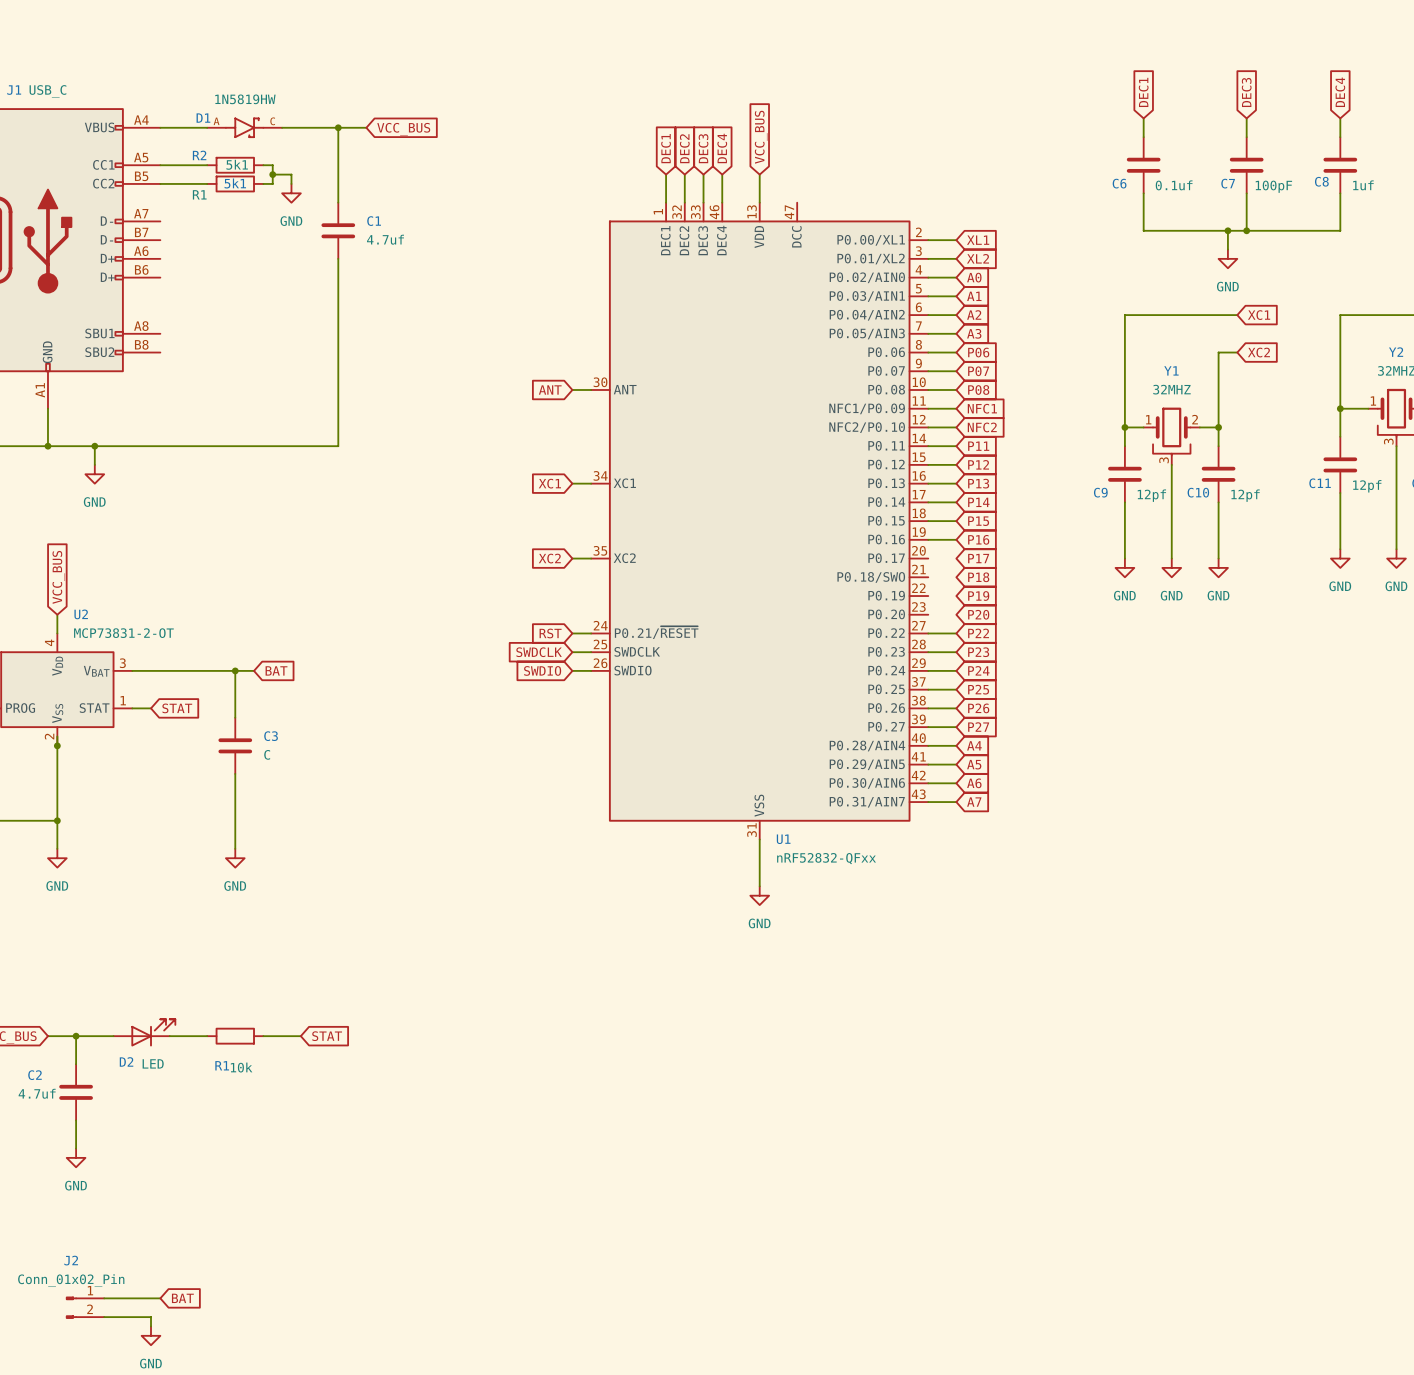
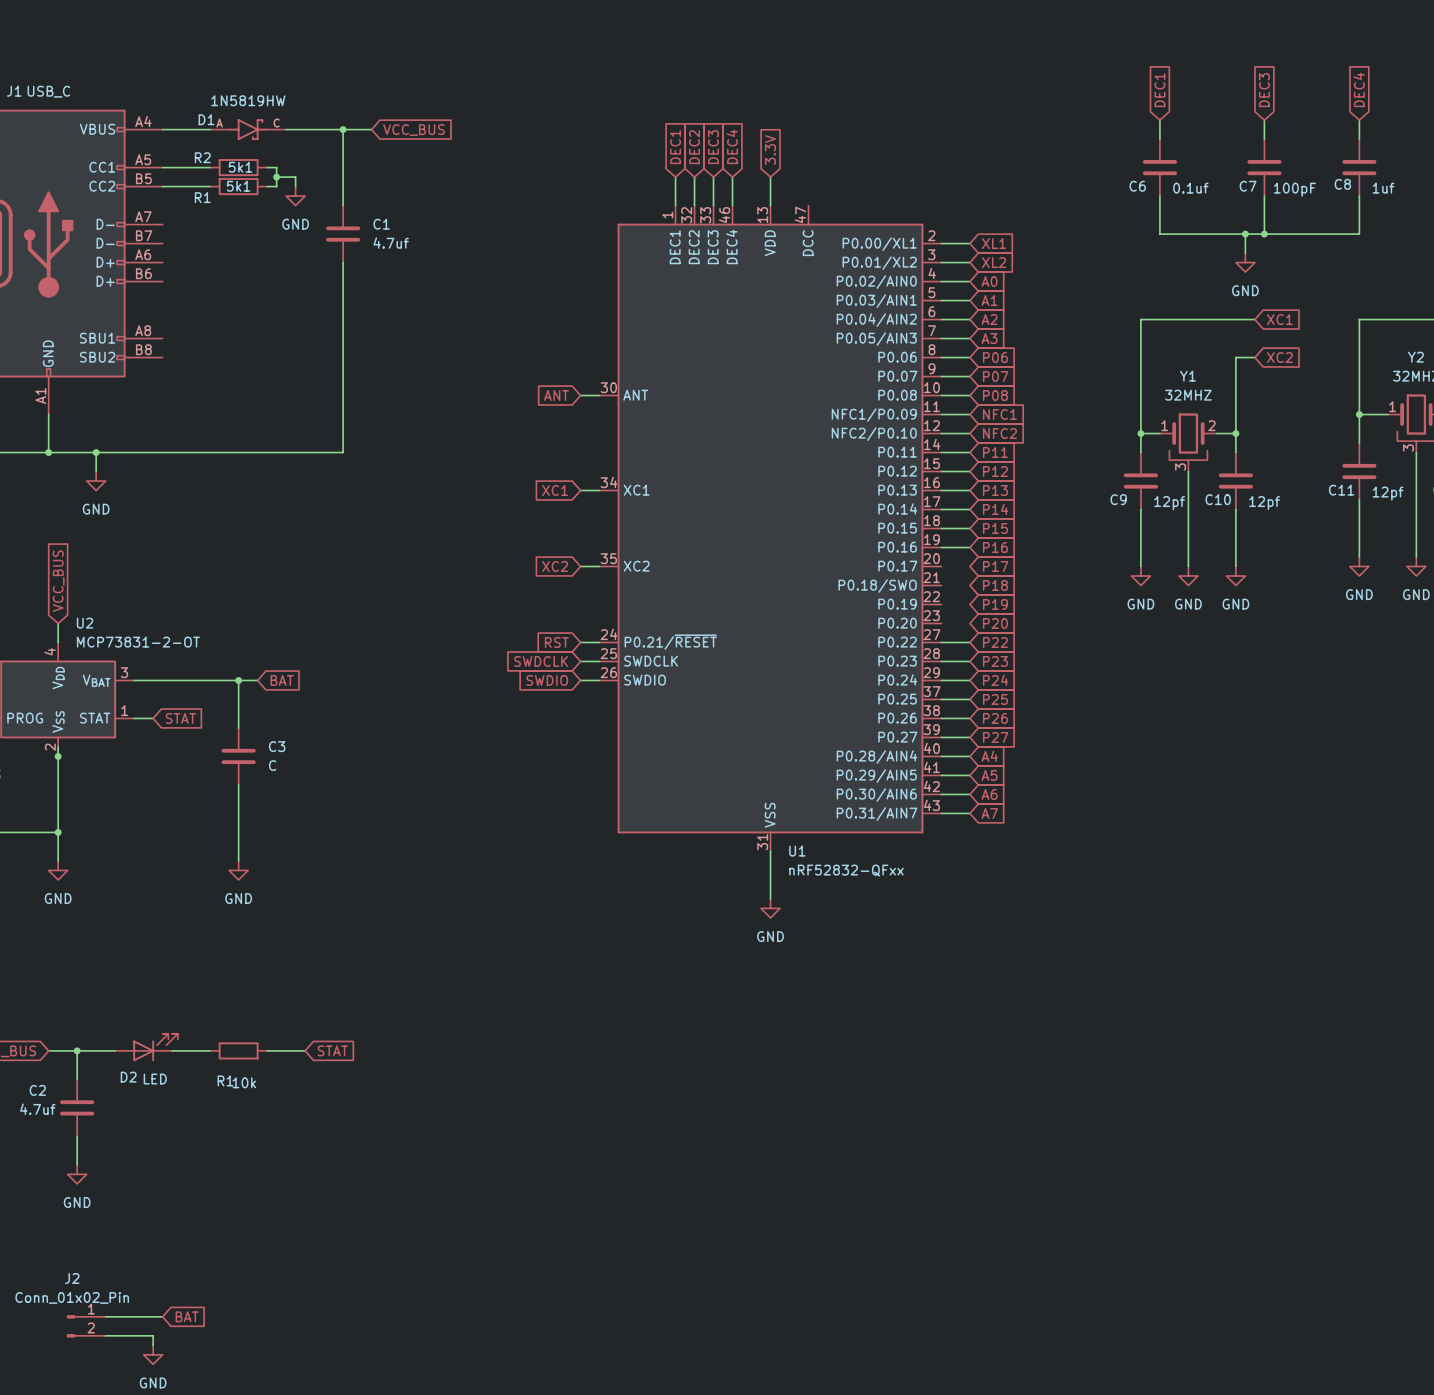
global label: VCC_BUS (761, 137) -> 3.3V (770, 150)

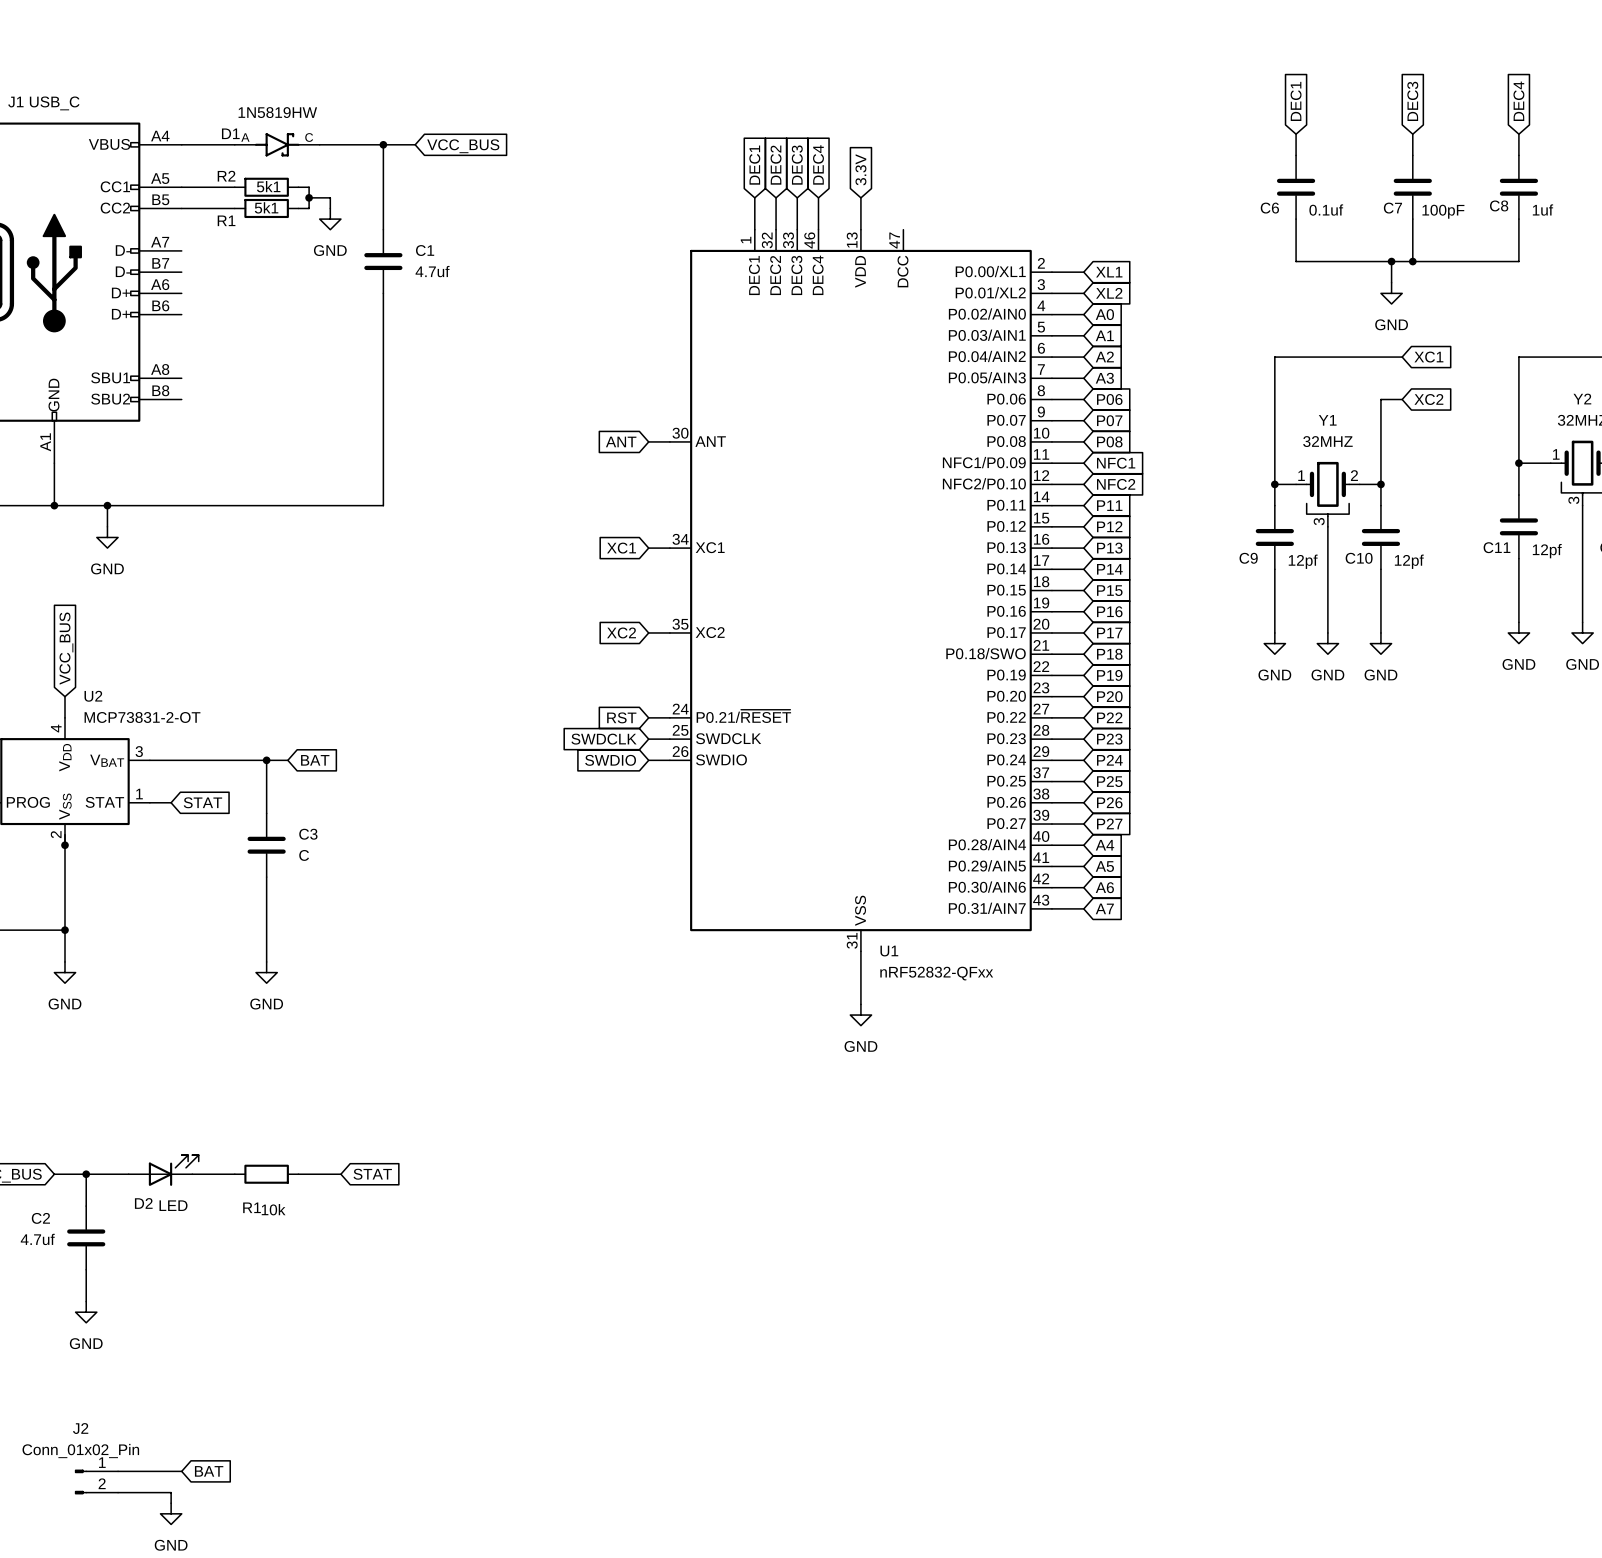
wire: none -> (1051, 632) (1083, 632)
wire: none -> (1051, 654) (1083, 654)
wire: none -> (1051, 675) (1083, 675)
wire: none -> (1051, 696) (1083, 696)

